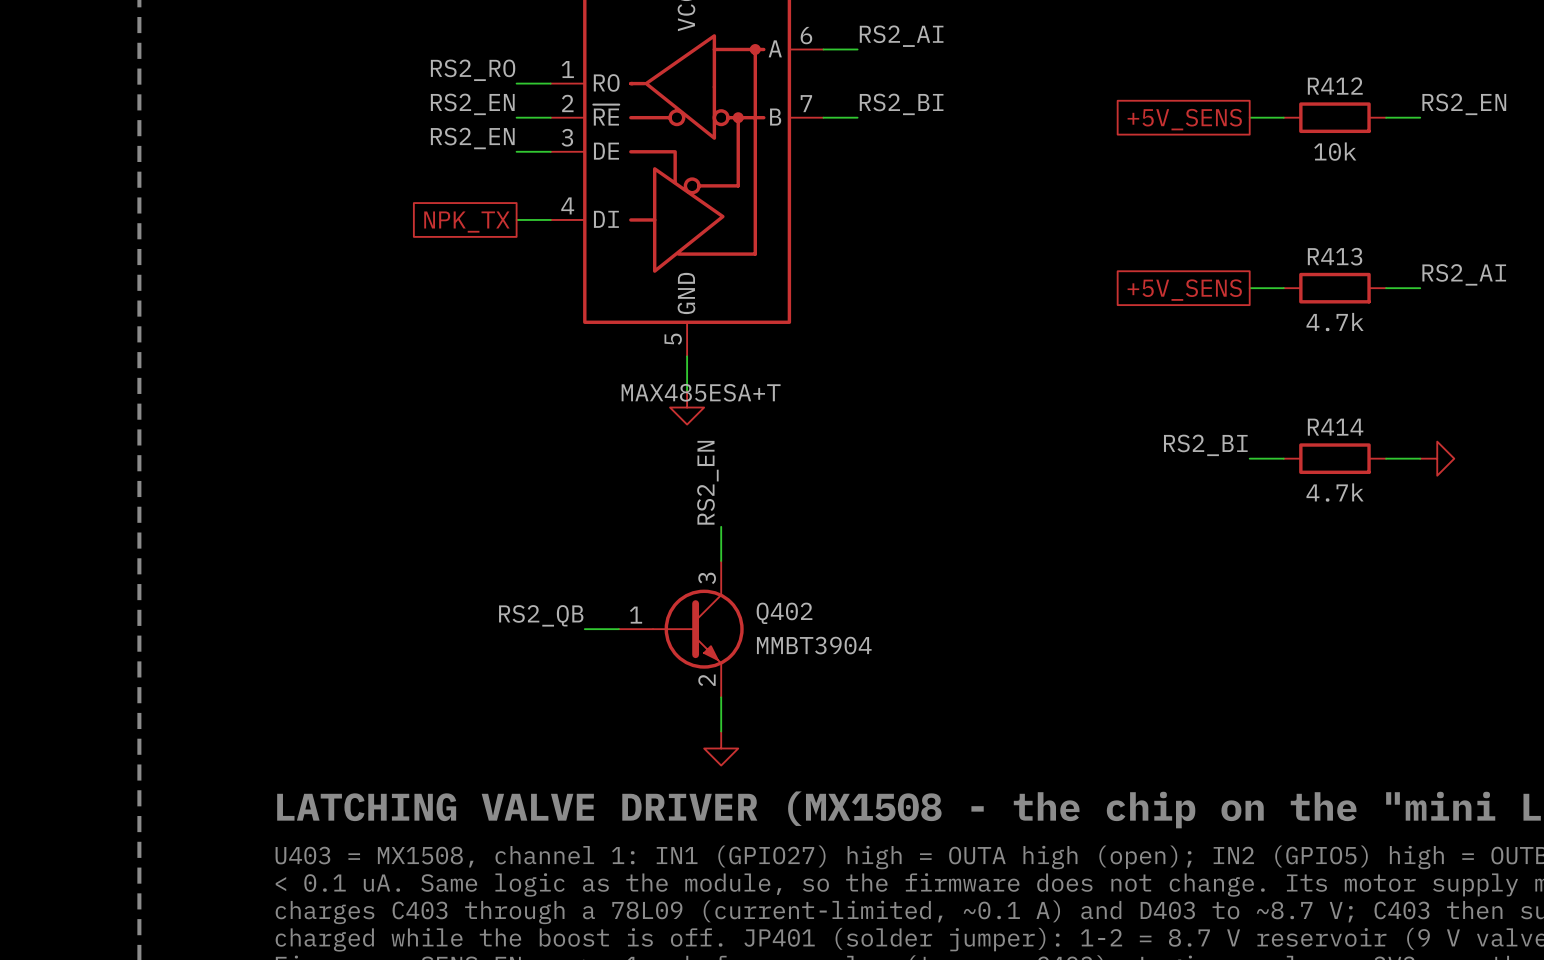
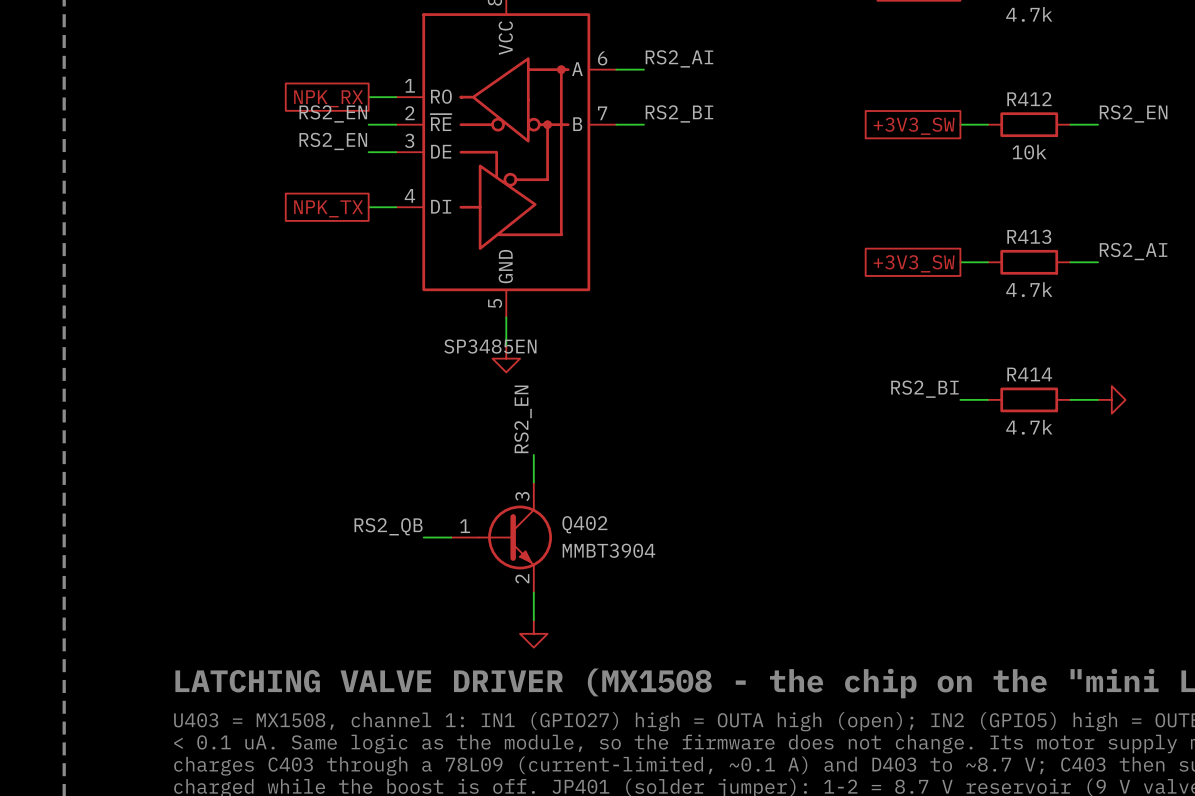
label: RS2_RO (473, 70) -> none
global label: none -> NPK_RX (328, 98)
global label: +5V_SENS (1184, 119) -> +3V3_SW (914, 126)
global label: +5V_SENS (1184, 290) -> +3V3_SW (914, 263)
part value: MAX485ESA+T (701, 392) -> SP3485EN (490, 346)

